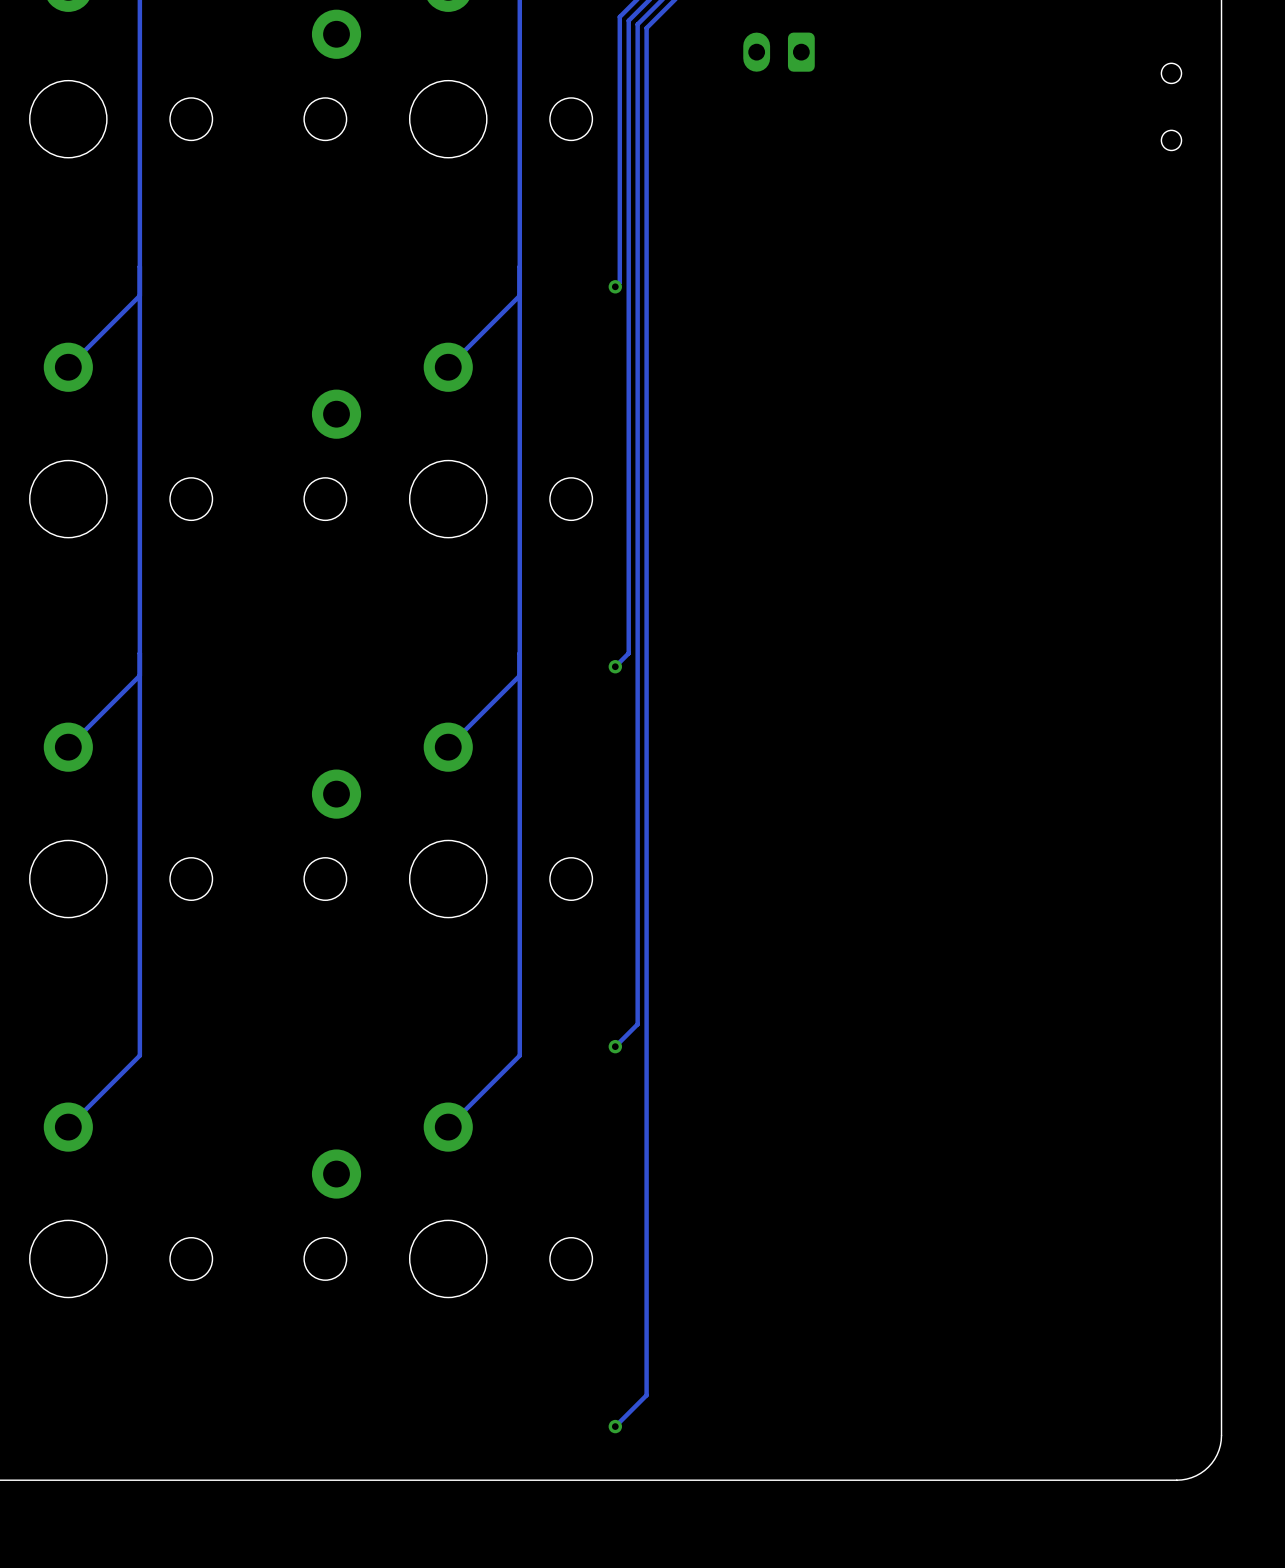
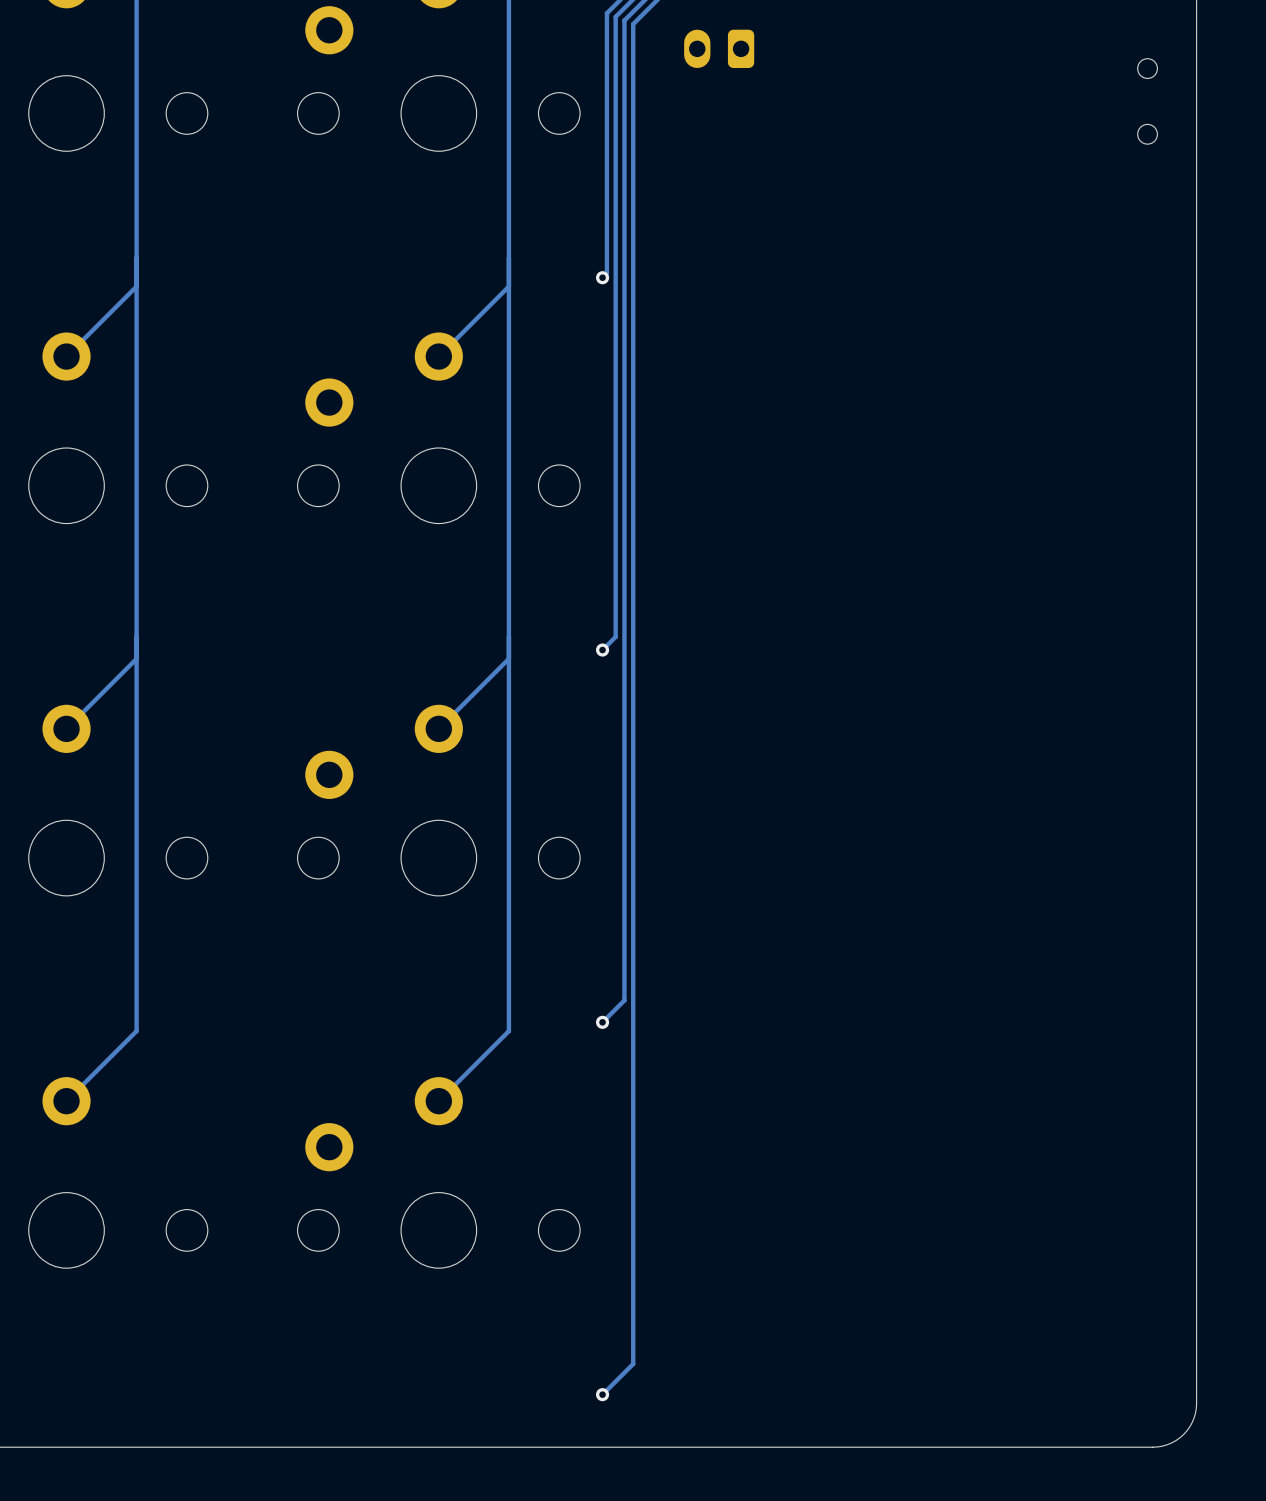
part position: (779, 52) -> (719, 48)

